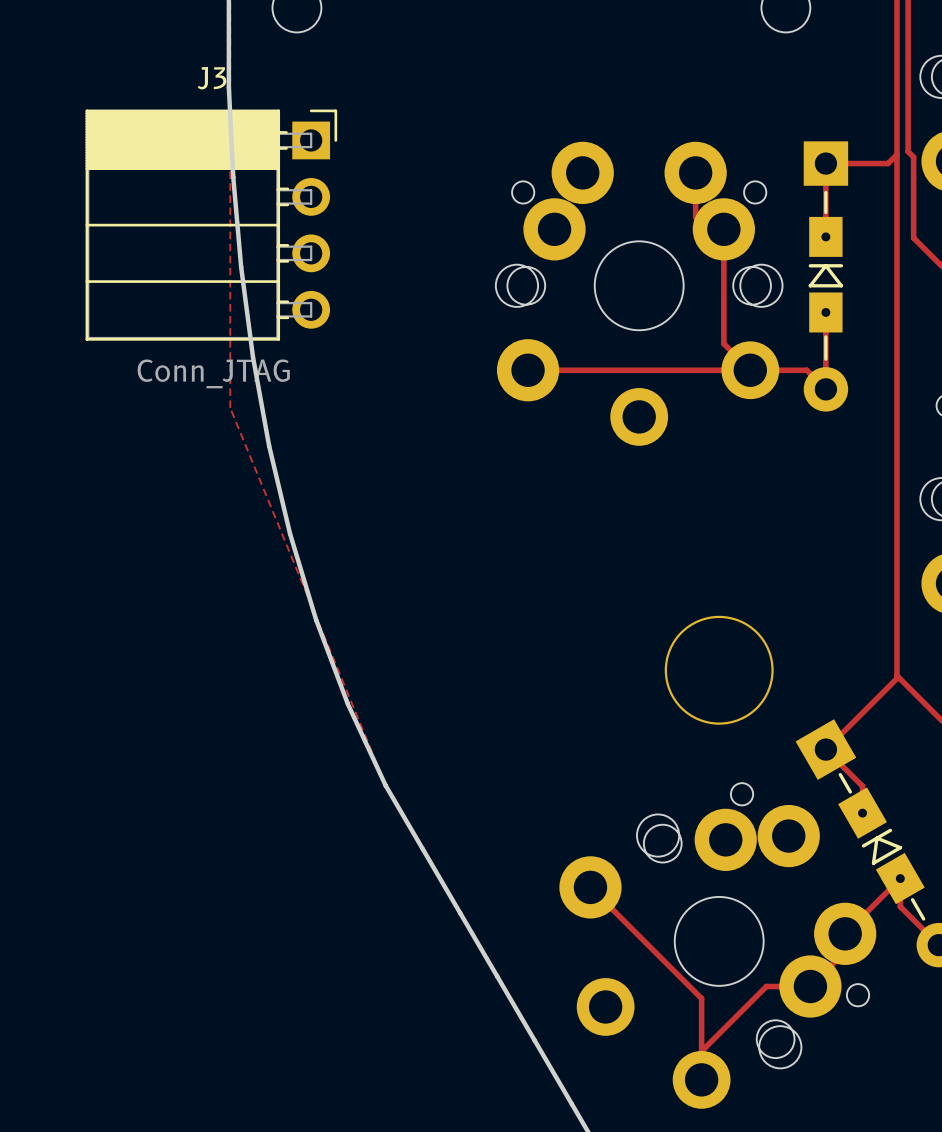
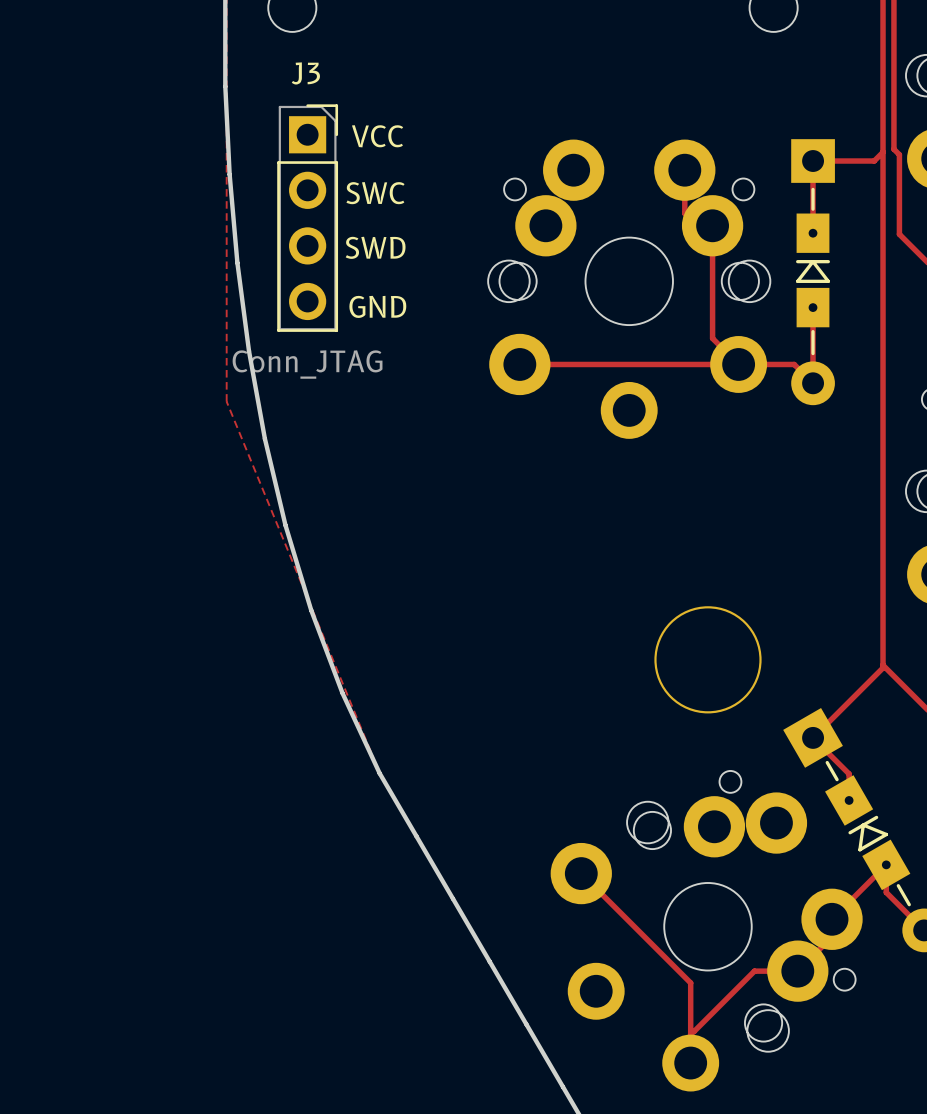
J3 footprint: [85, 109, 338, 341] -> [277, 104, 339, 332]
text: none -> VCC (377, 136)
text: none -> SWC (375, 193)
text: none -> SWD (375, 247)
text: none -> GND (377, 306)

